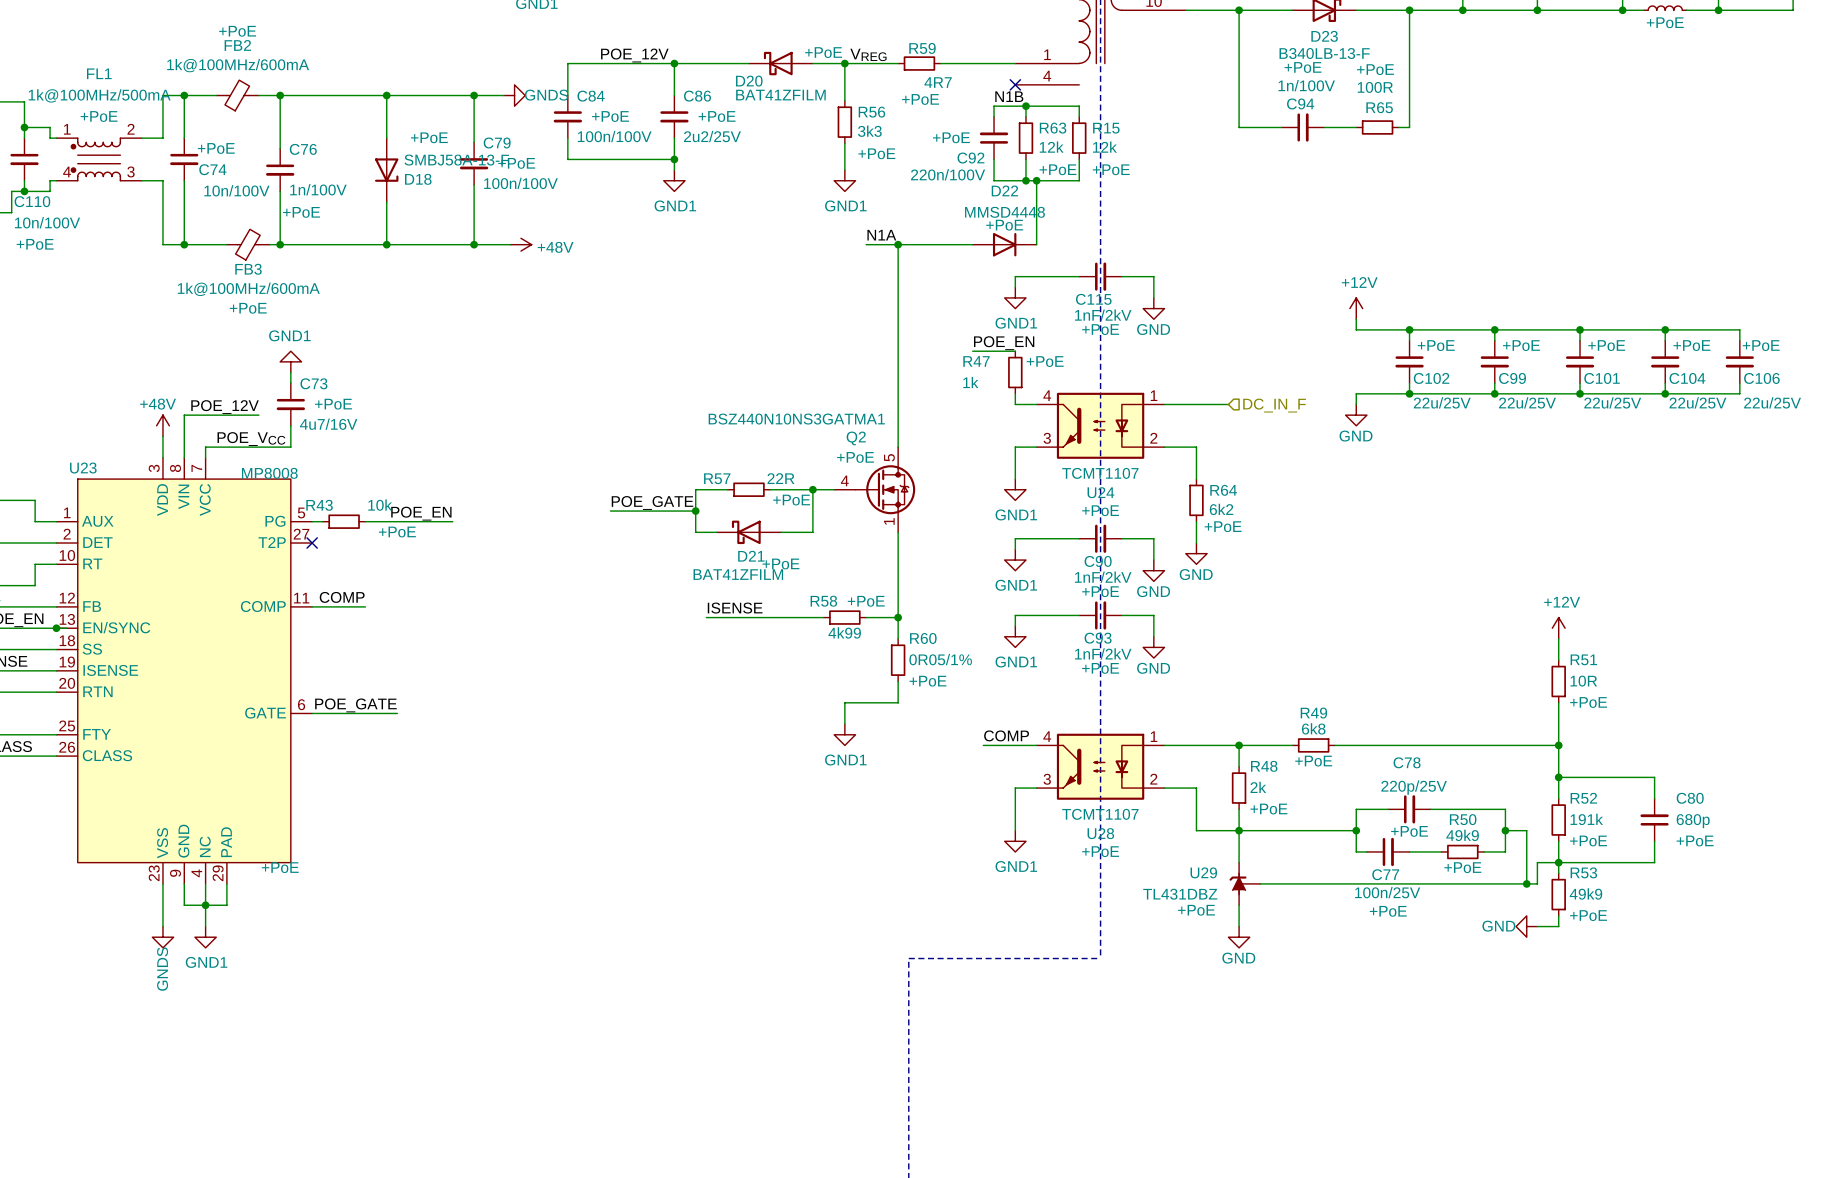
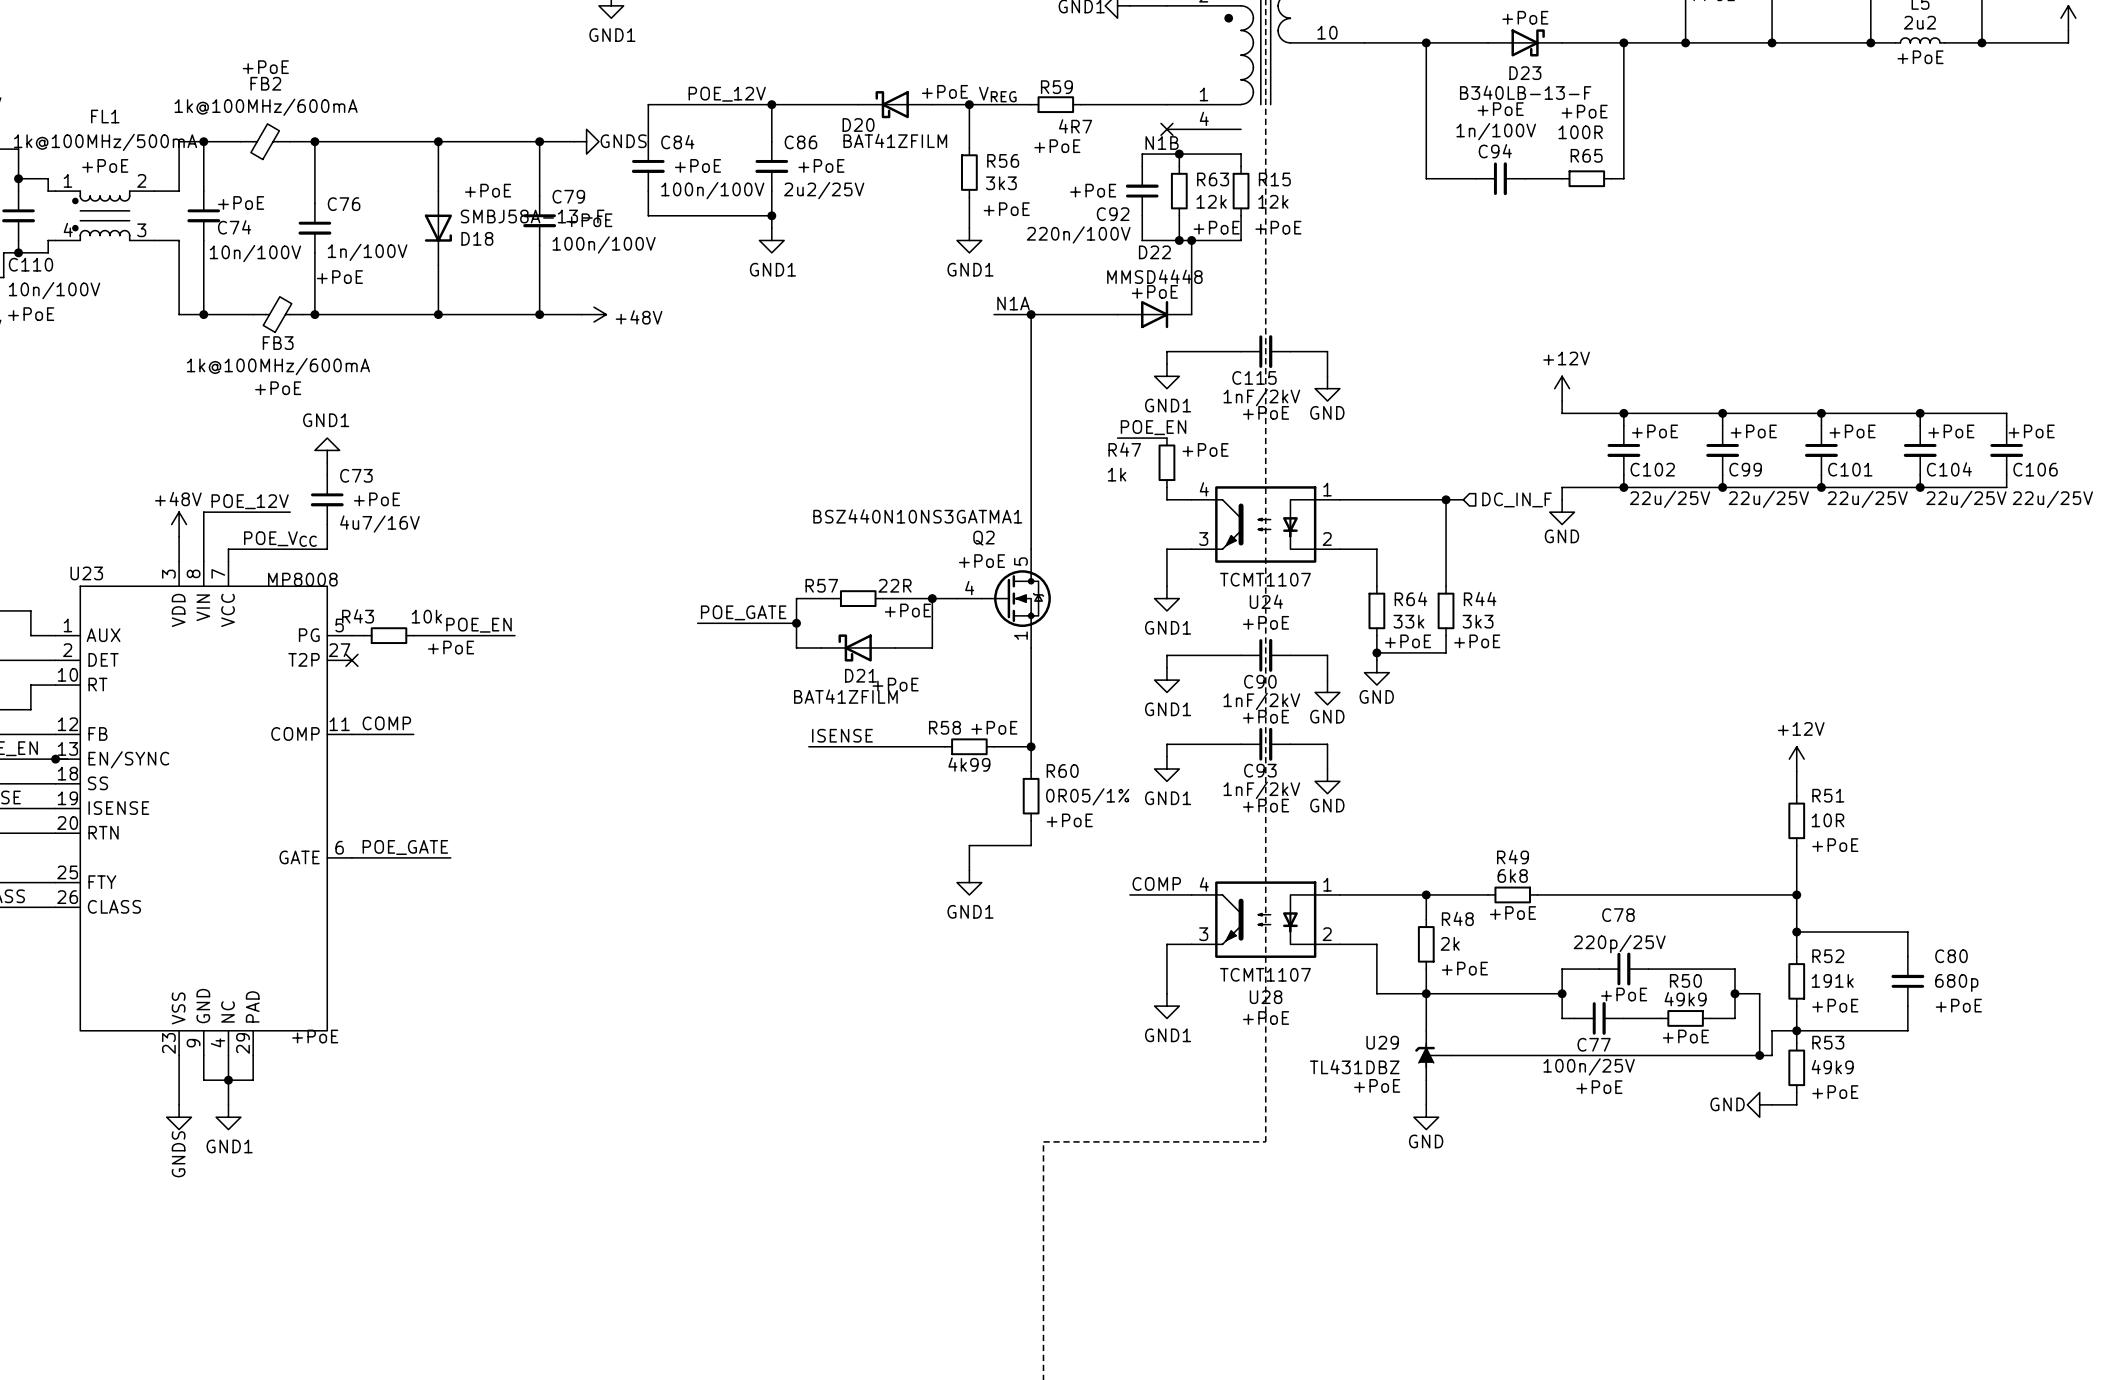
wire: none -> (1413, 499) (1463, 499)
wire: none -> (1446, 499) (1446, 586)
junction: none -> (1446, 499)
hierarchical label position: DC_IN_F (1274, 405) -> DC_IN_F (1517, 499)
R44: none -> 3k3 (1446, 610)
R64 value: 6k2 (1221, 509) -> 33k (1408, 621)
wire: none -> (1446, 635) (1446, 652) (1376, 652)
junction: none -> (1376, 652)

